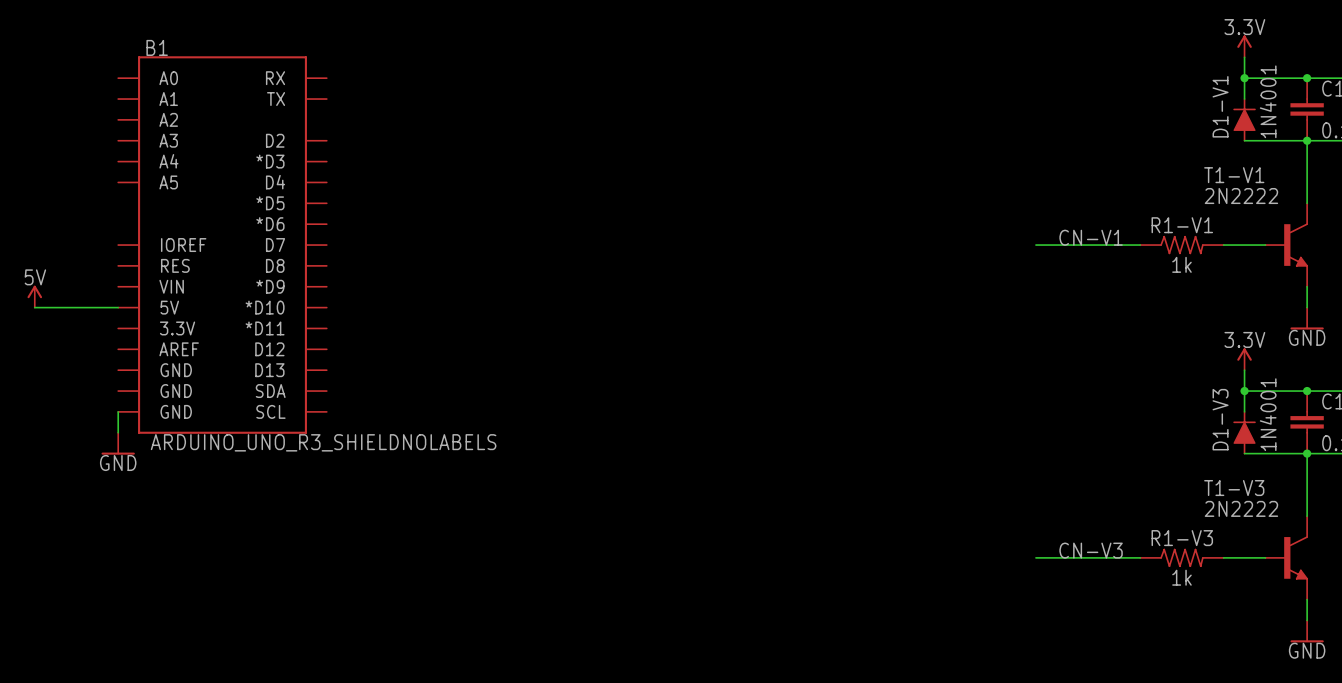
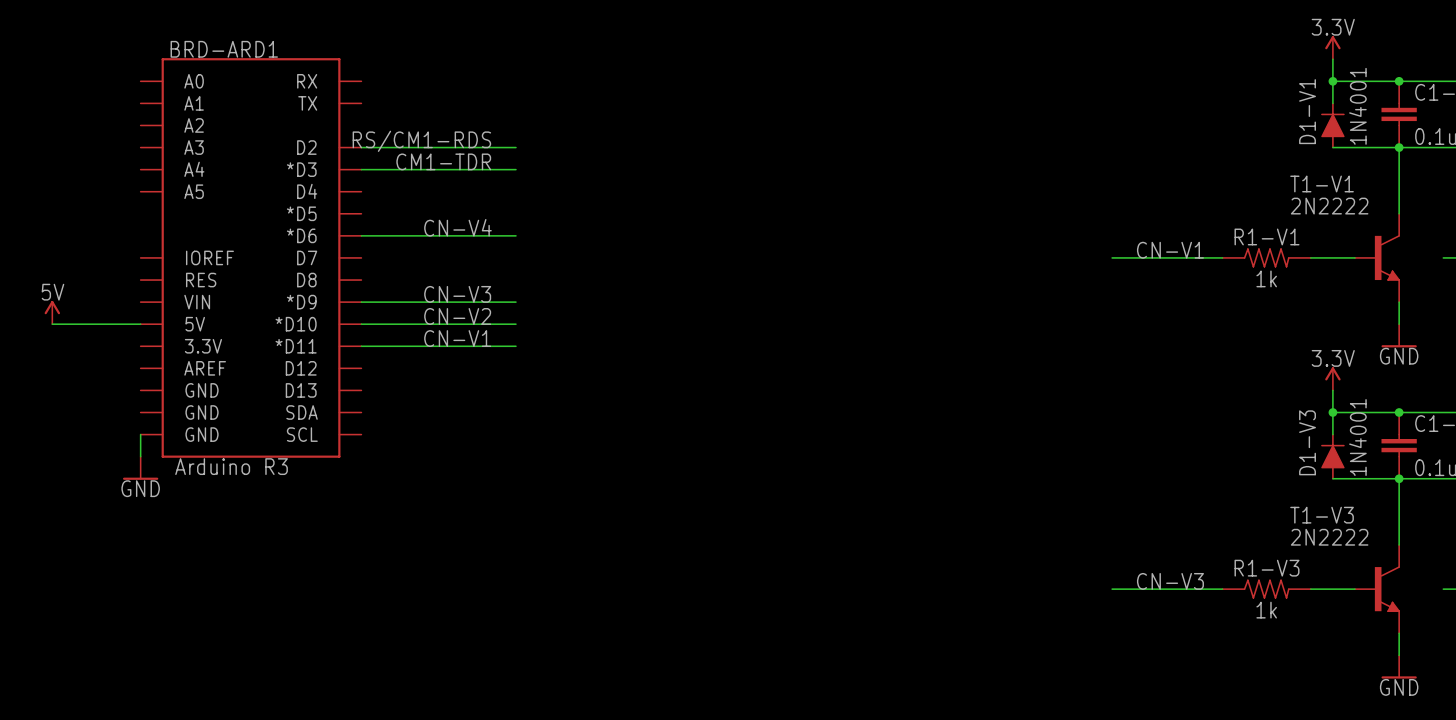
B1 name: B1 (157, 47) -> BRD-ARD1 (224, 49)
label: none -> RS/CM1-RDS (421, 141)
wire: none -> (361, 147) (515, 147)
label: none -> CM1-TDR (443, 161)
wire: none -> (361, 169) (515, 169)
label: none -> CN-V4 (457, 227)
wire: none -> (361, 235) (515, 235)
label: none -> CN-V3 (457, 294)
wire: none -> (361, 302) (515, 302)
label: none -> CN-V2 (457, 316)
wire: none -> (361, 324) (515, 324)
label: none -> CN-V1 (457, 338)
wire: none -> (361, 346) (515, 346)
B1 value: ARDUINO_UNO_R3_SHIELDNOLABELS (323, 442) -> Arduino R3 (231, 466)

